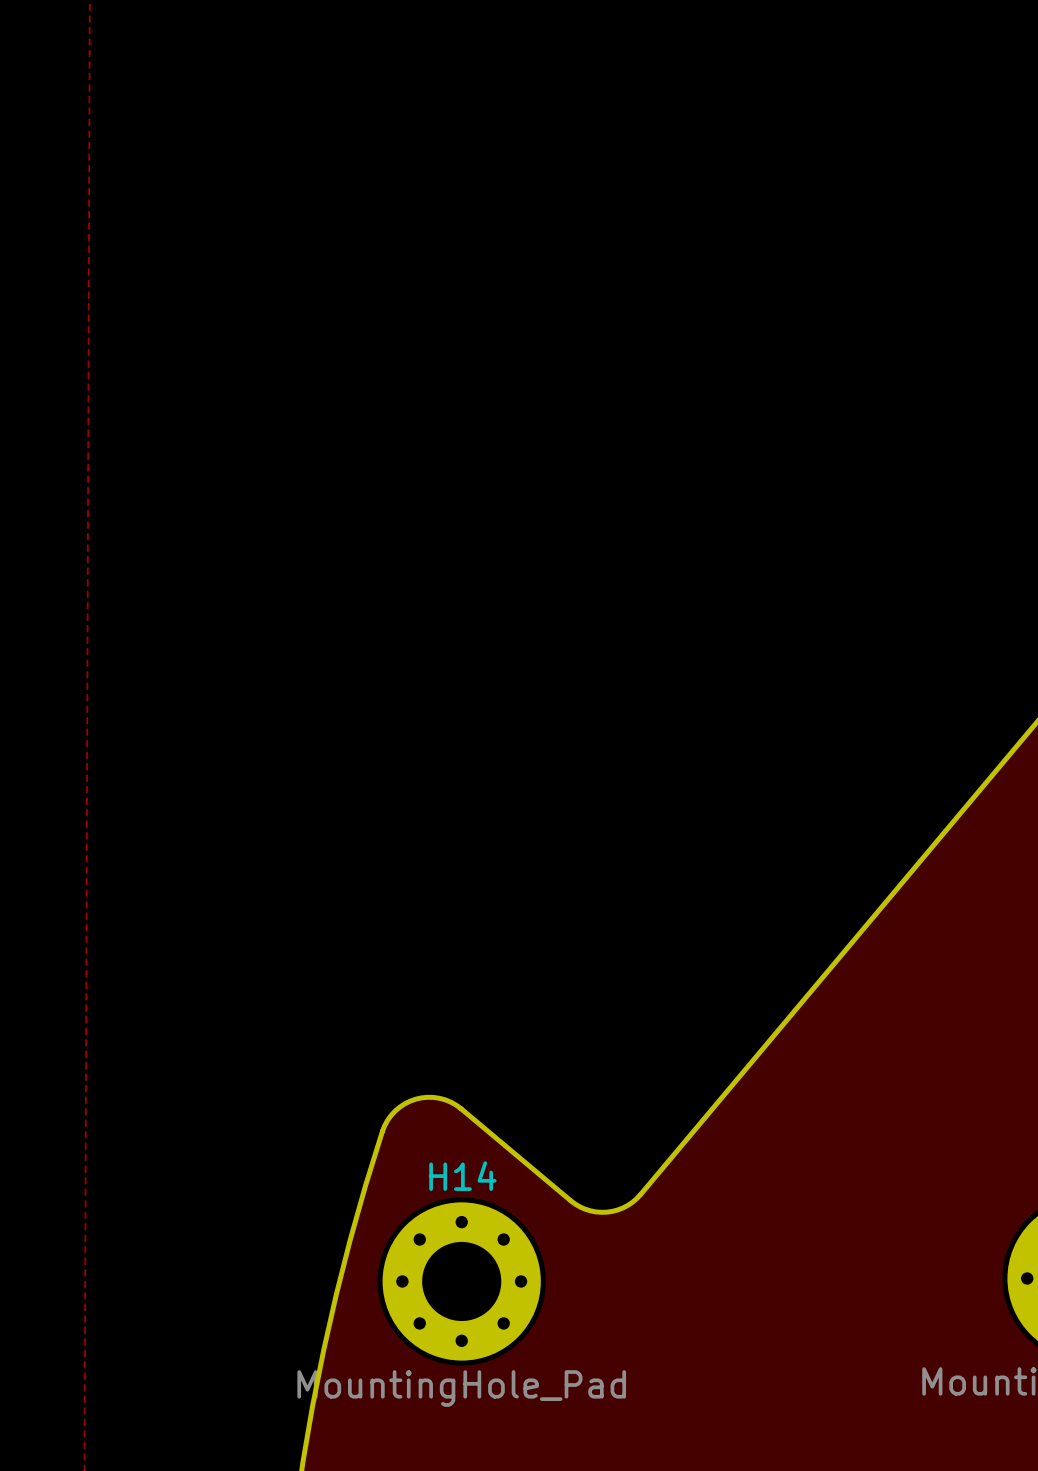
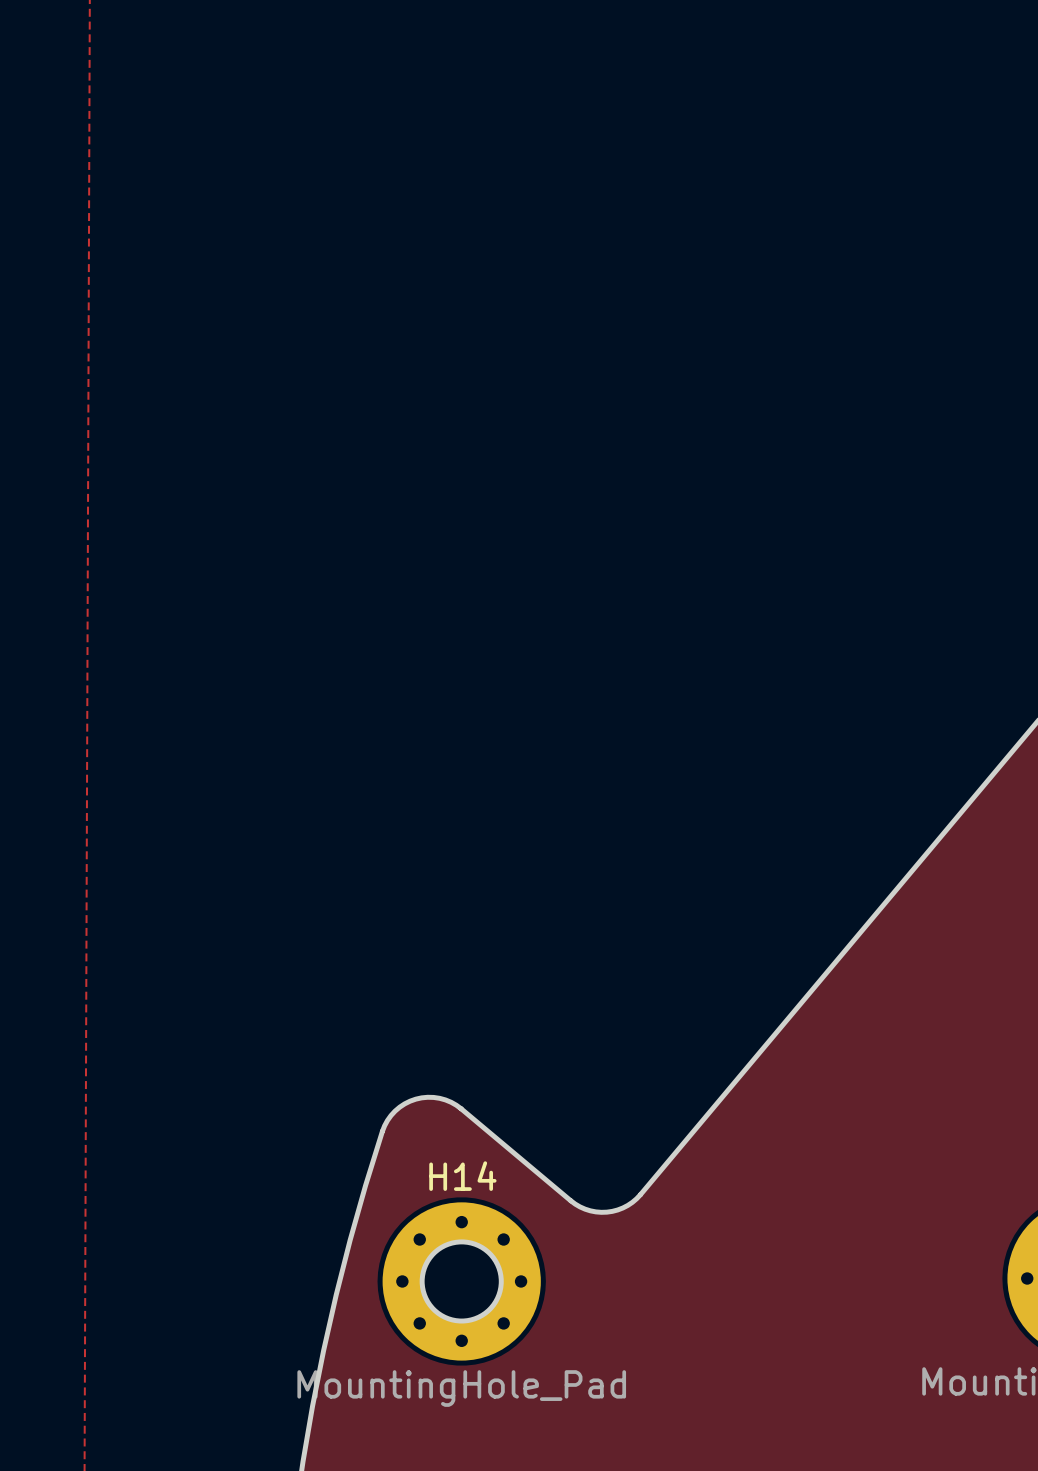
round board edge: none -> [419, 1239, 504, 1324]

